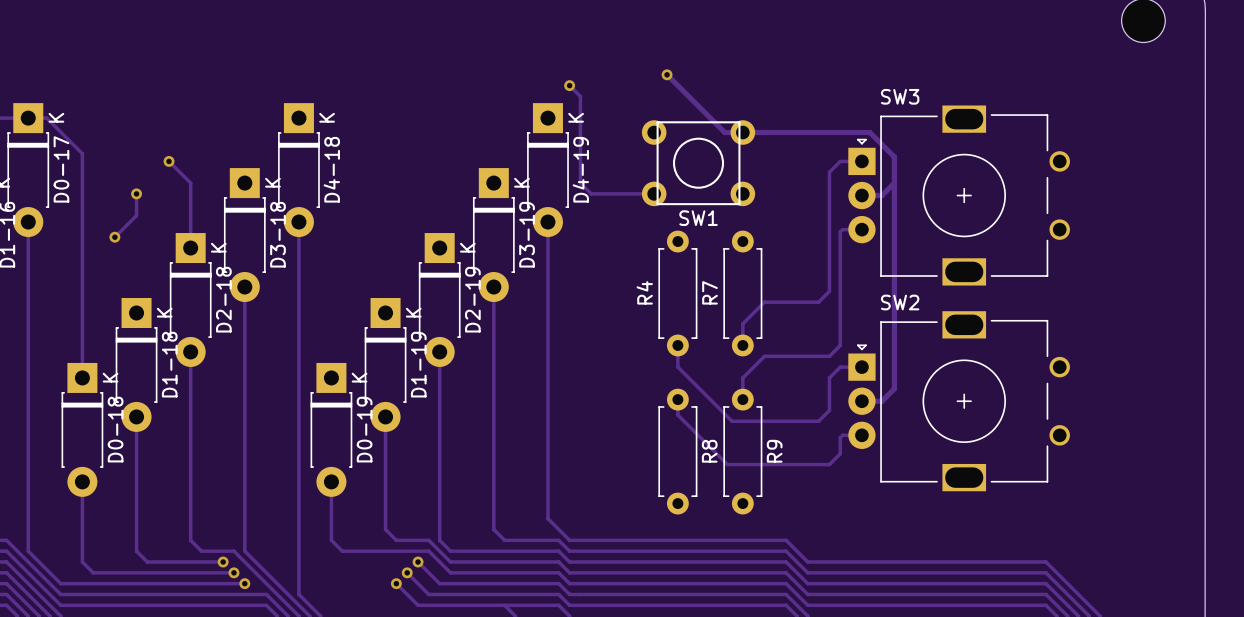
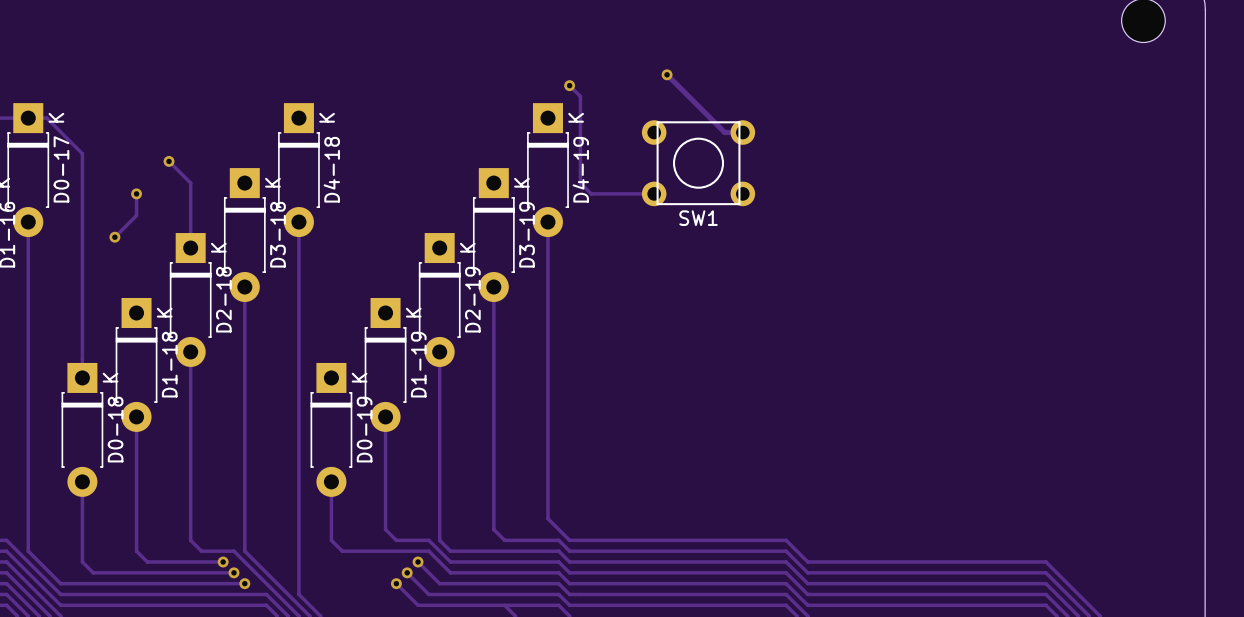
track: (742, 132) (869, 132) (894, 157) (894, 388) (881, 401) (861, 401) -> none
track: (861, 161) (840, 161) (829, 172) (829, 291) (818, 302) (764, 302) (742, 323) (742, 345) -> none
track: (894, 183) (881, 195) (861, 195) -> none
SW3: (959, 195) -> none
track: (861, 229) (842, 229) (840, 231) (840, 345) (829, 356) (764, 356) (742, 377) (742, 399) -> none
R4: (677, 293) -> none
R7: (742, 293) -> none
track: (677, 345) (677, 367) (732, 421) (818, 421) (829, 410) (829, 377) (840, 367) (861, 367) -> none
track: (677, 399) (677, 415) (727, 464) (829, 464) (840, 453) (840, 437) (842, 435) (861, 435) -> none
SW2: (959, 401) -> none
R8: (677, 451) -> none
R9: (742, 451) -> none

